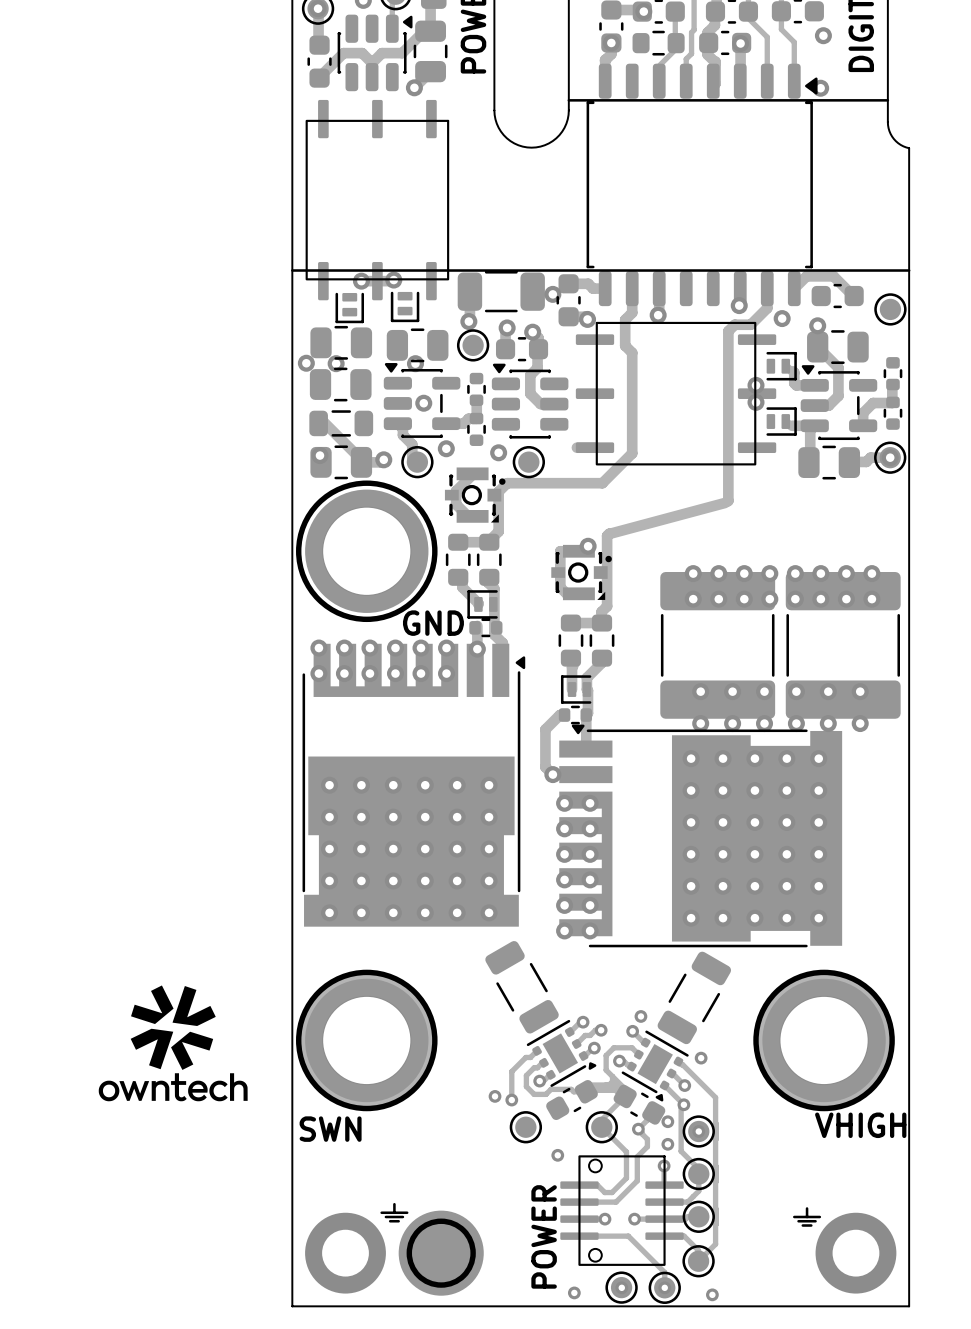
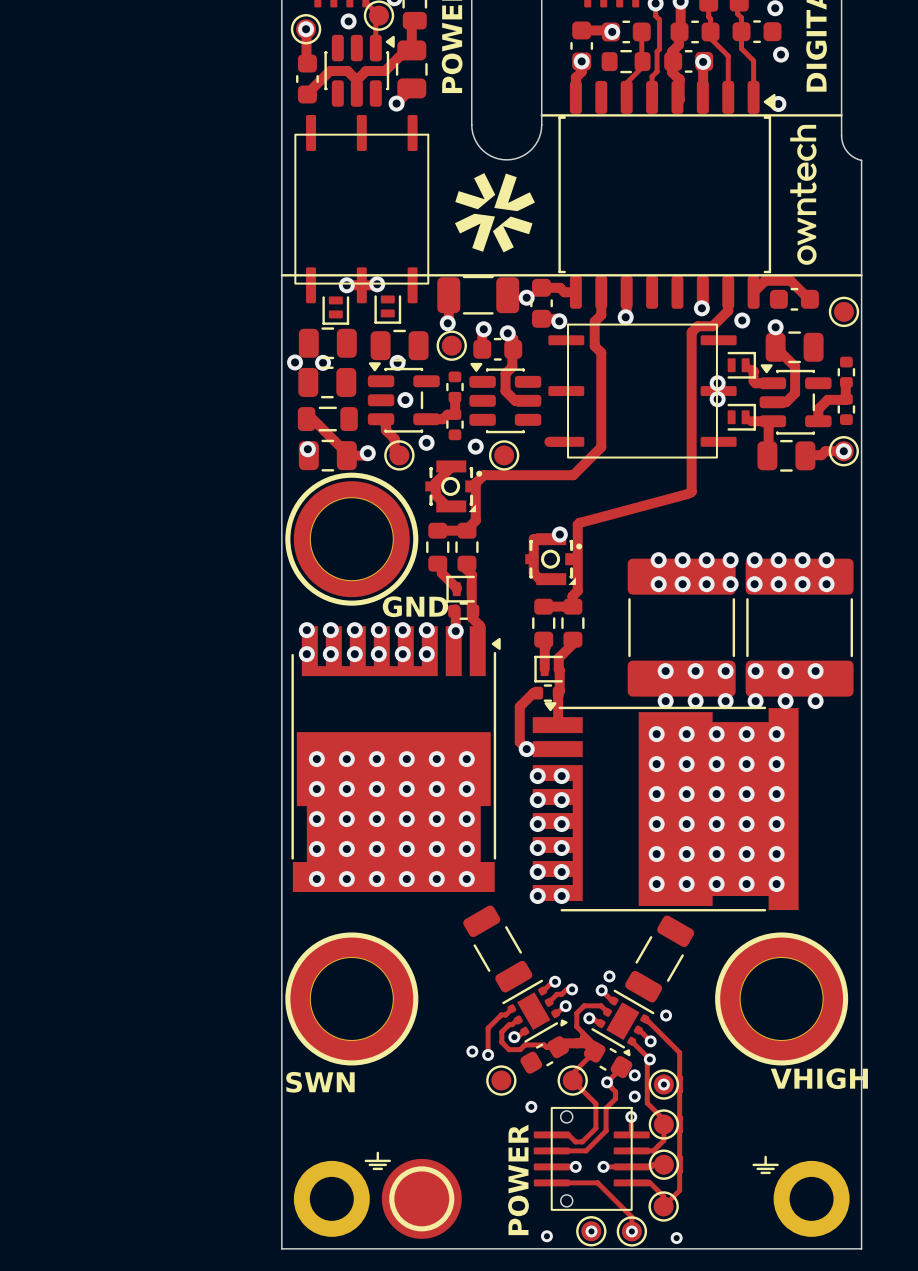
drawing: none -> [790, 124, 817, 265]
drawing: none -> [454, 173, 535, 253]
drawing: [98, 985, 248, 1102] -> none

